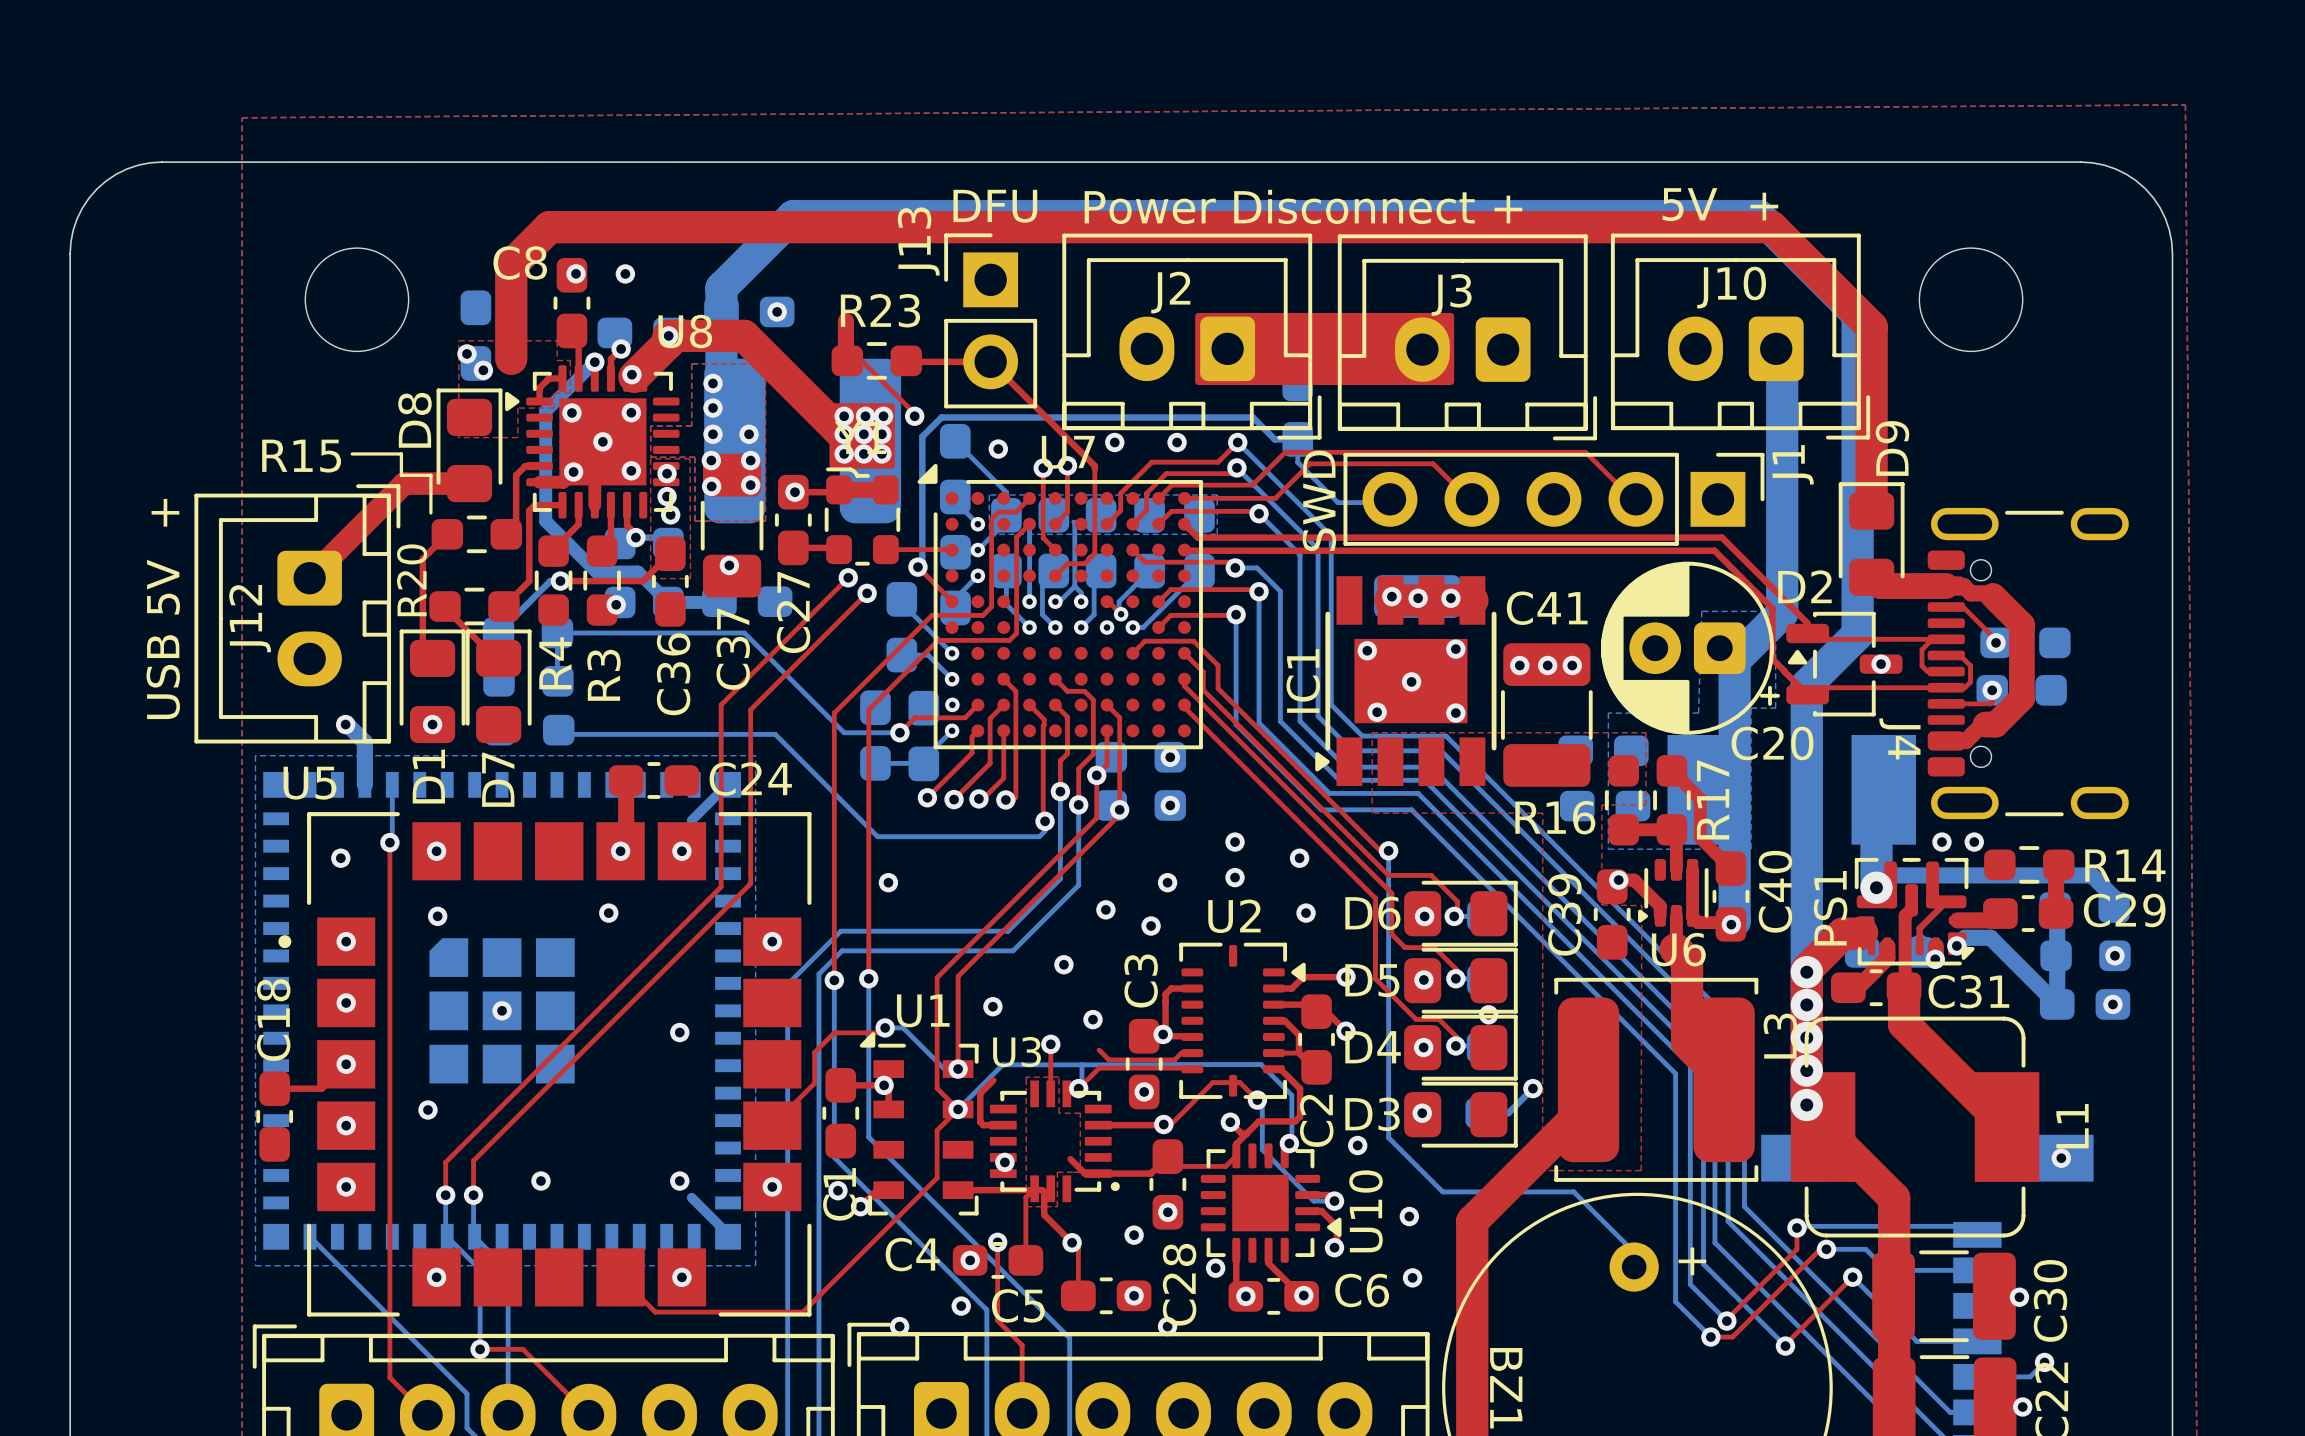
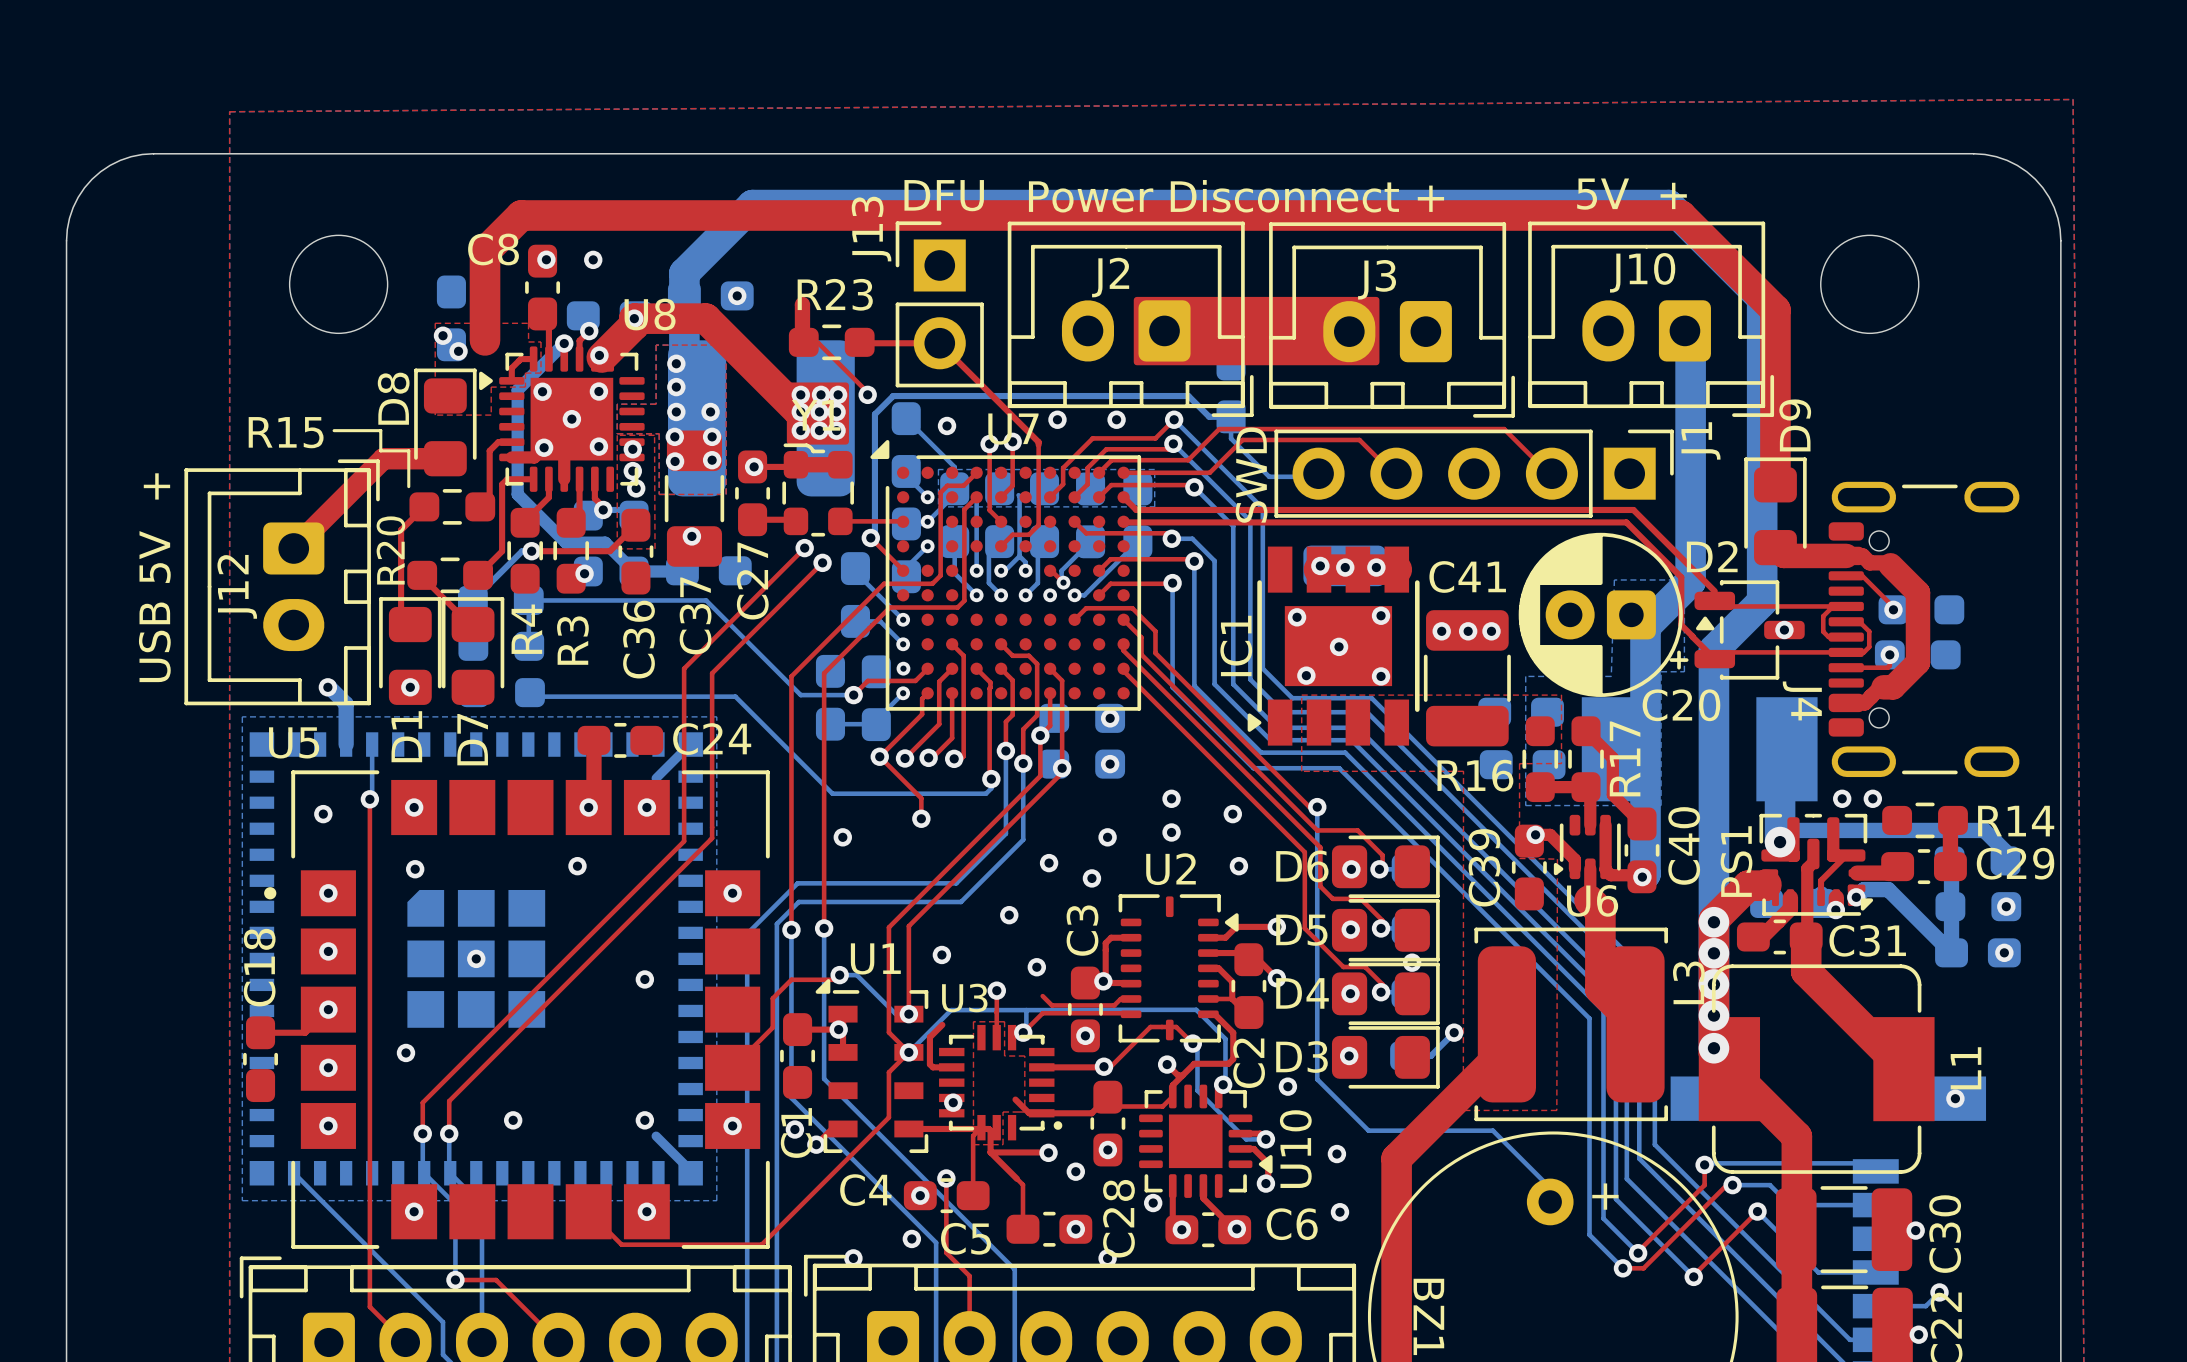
top track: none -> (879, 756) (921, 798) (921, 818)
via: none -> (921, 818)
top track: none -> (990, 1152) (1048, 1153)
via position: (1072, 1242) -> (1048, 1152)

